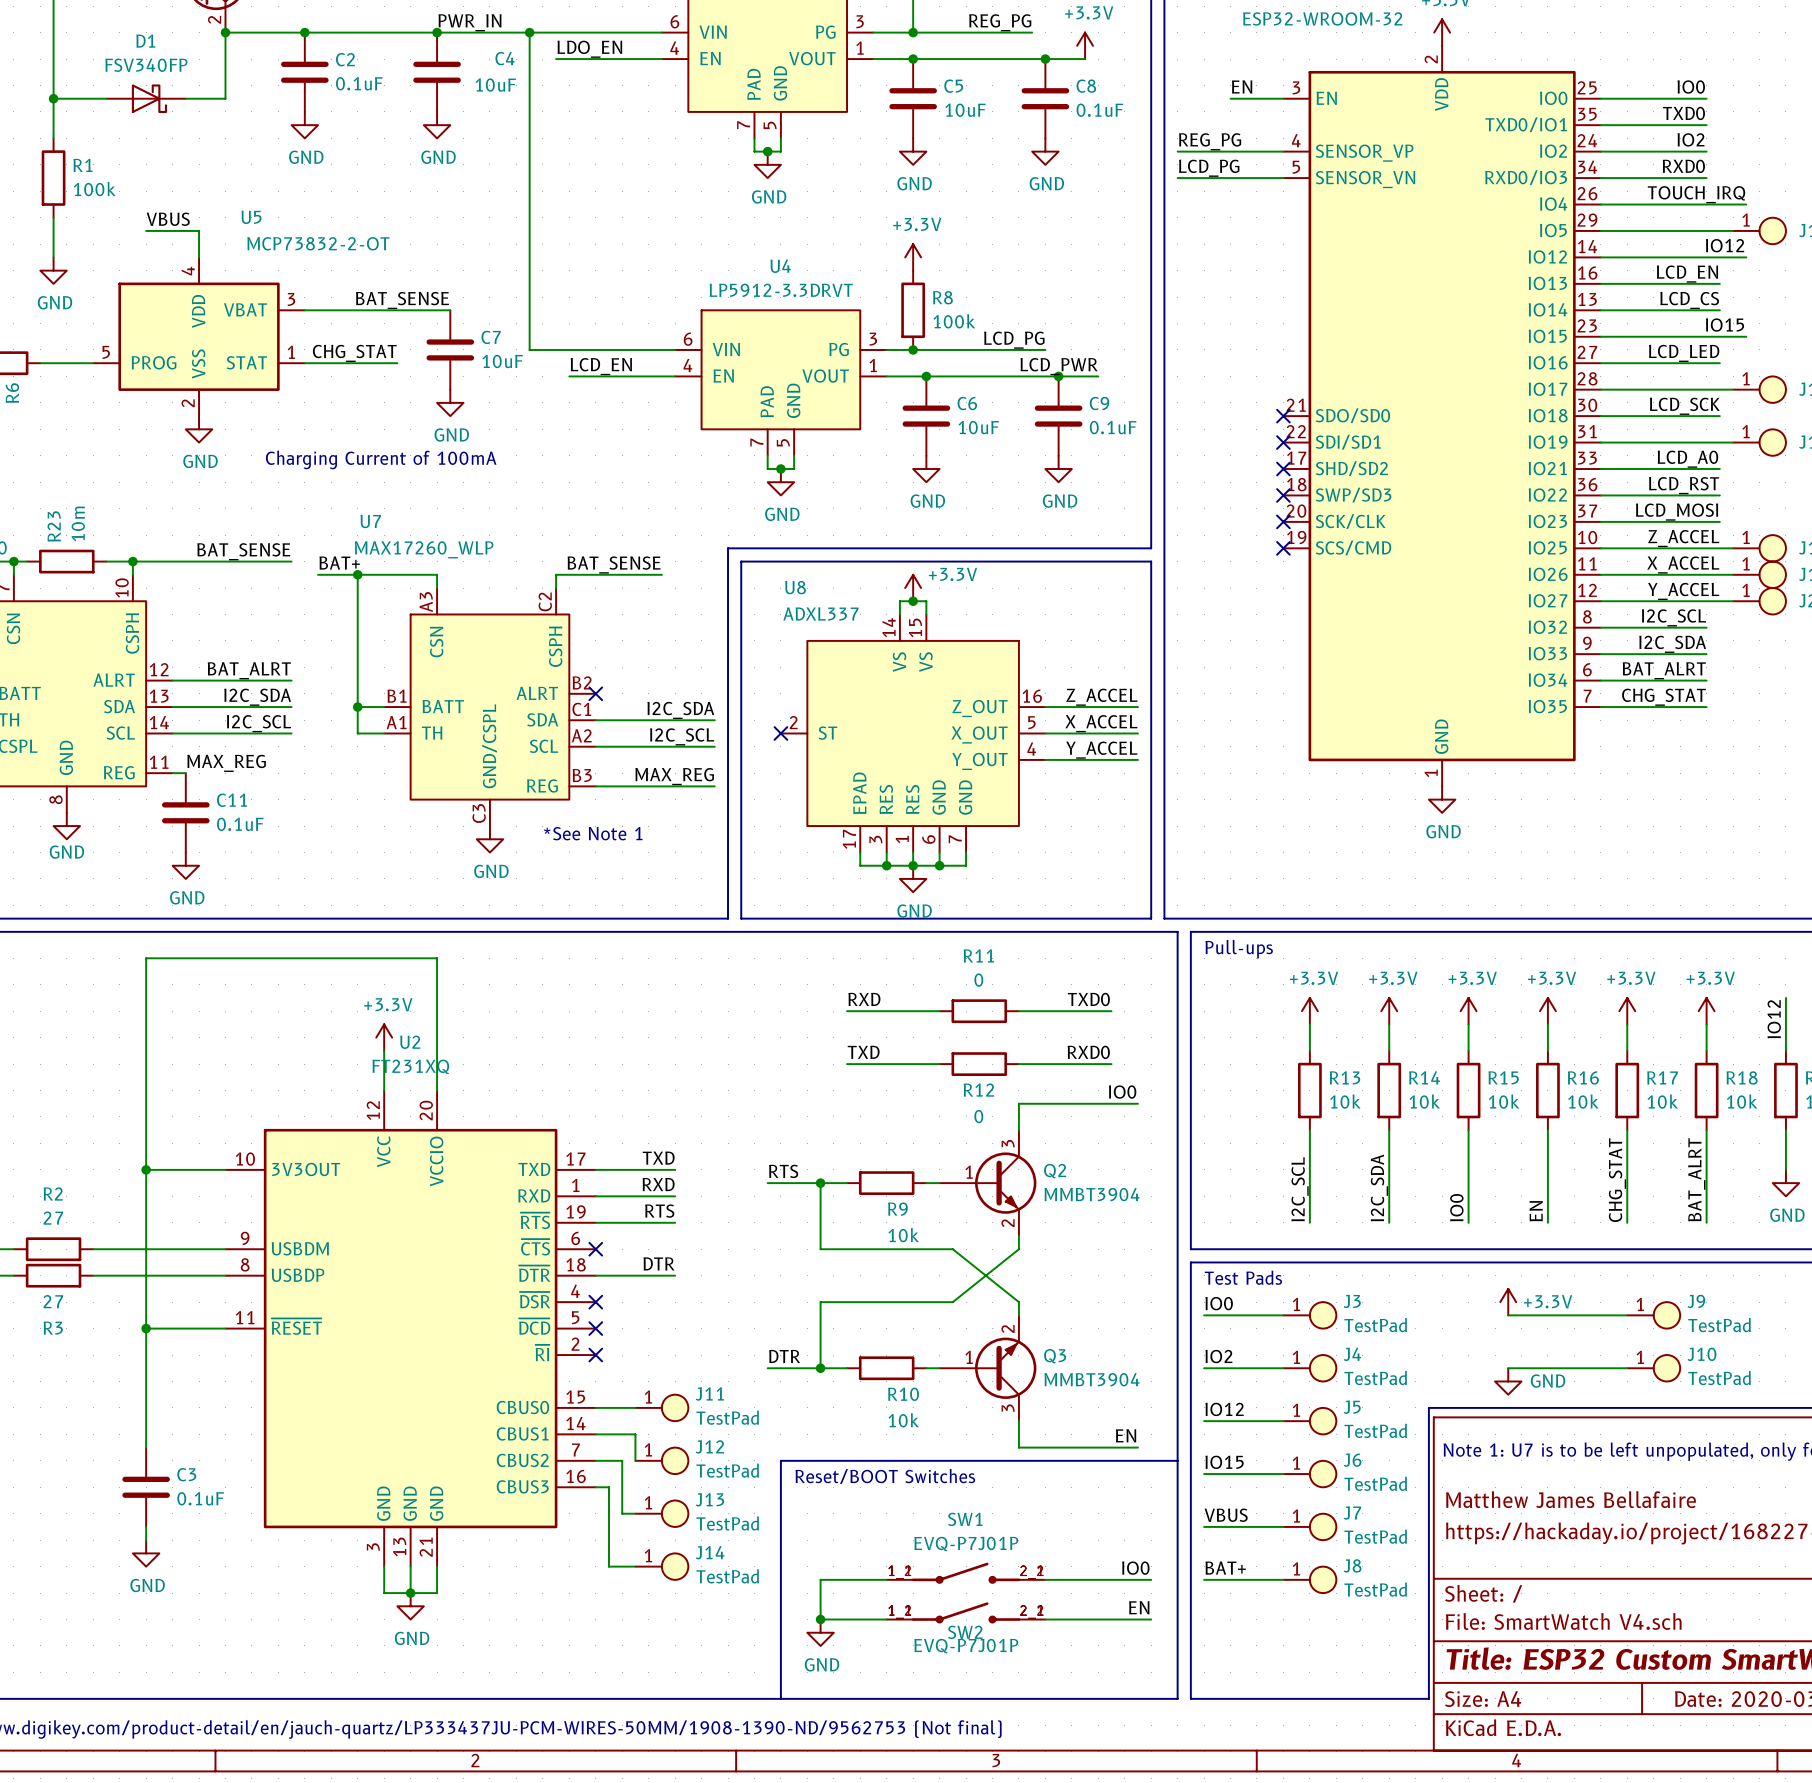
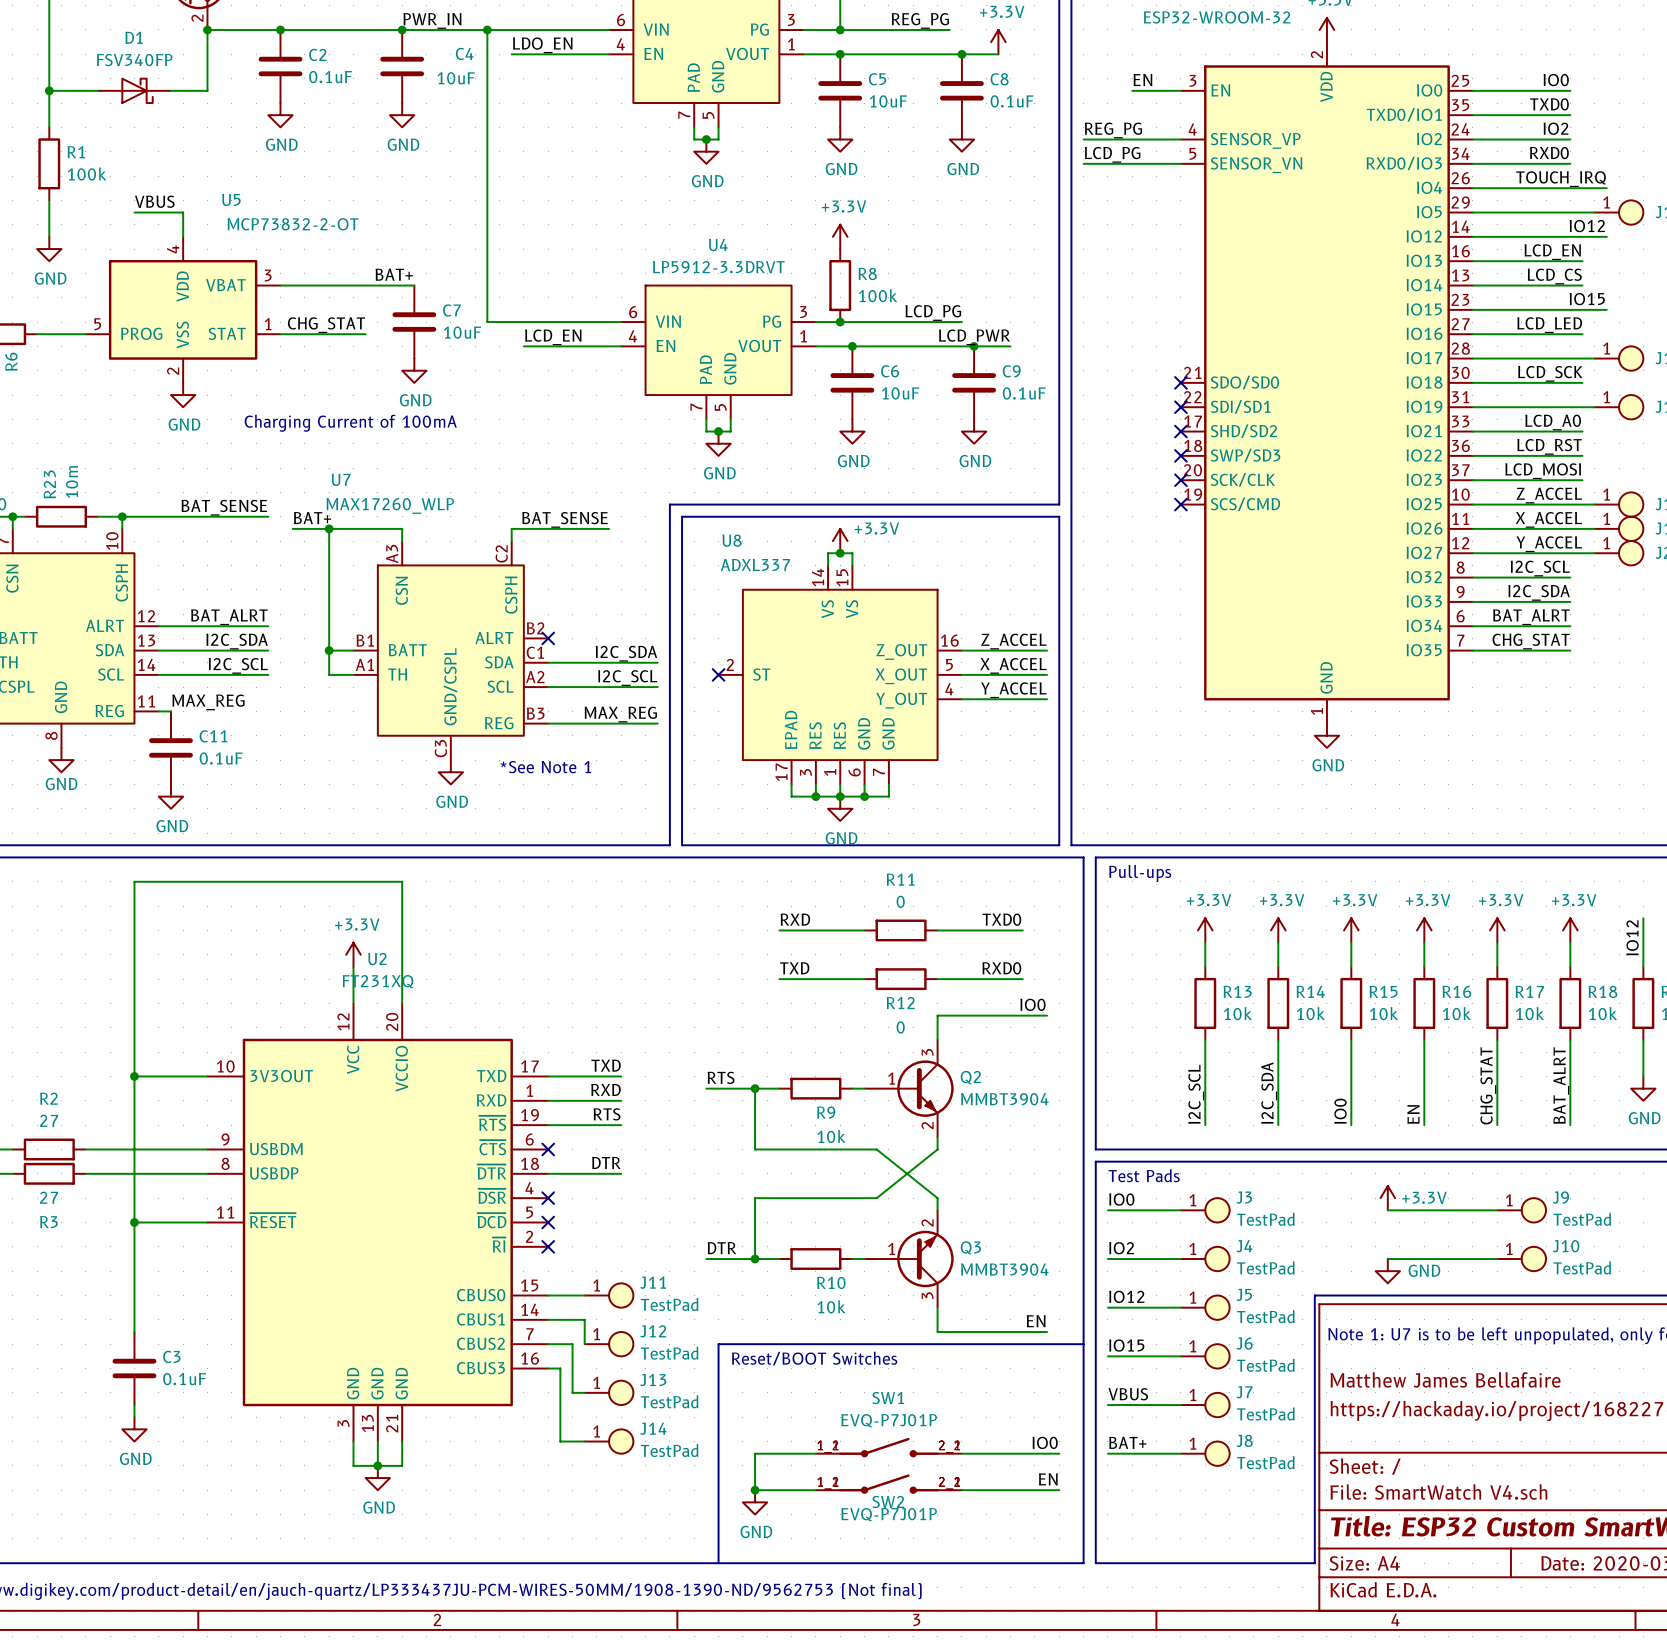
label: BAT_SENSE (402, 300) -> BAT+ (394, 274)

